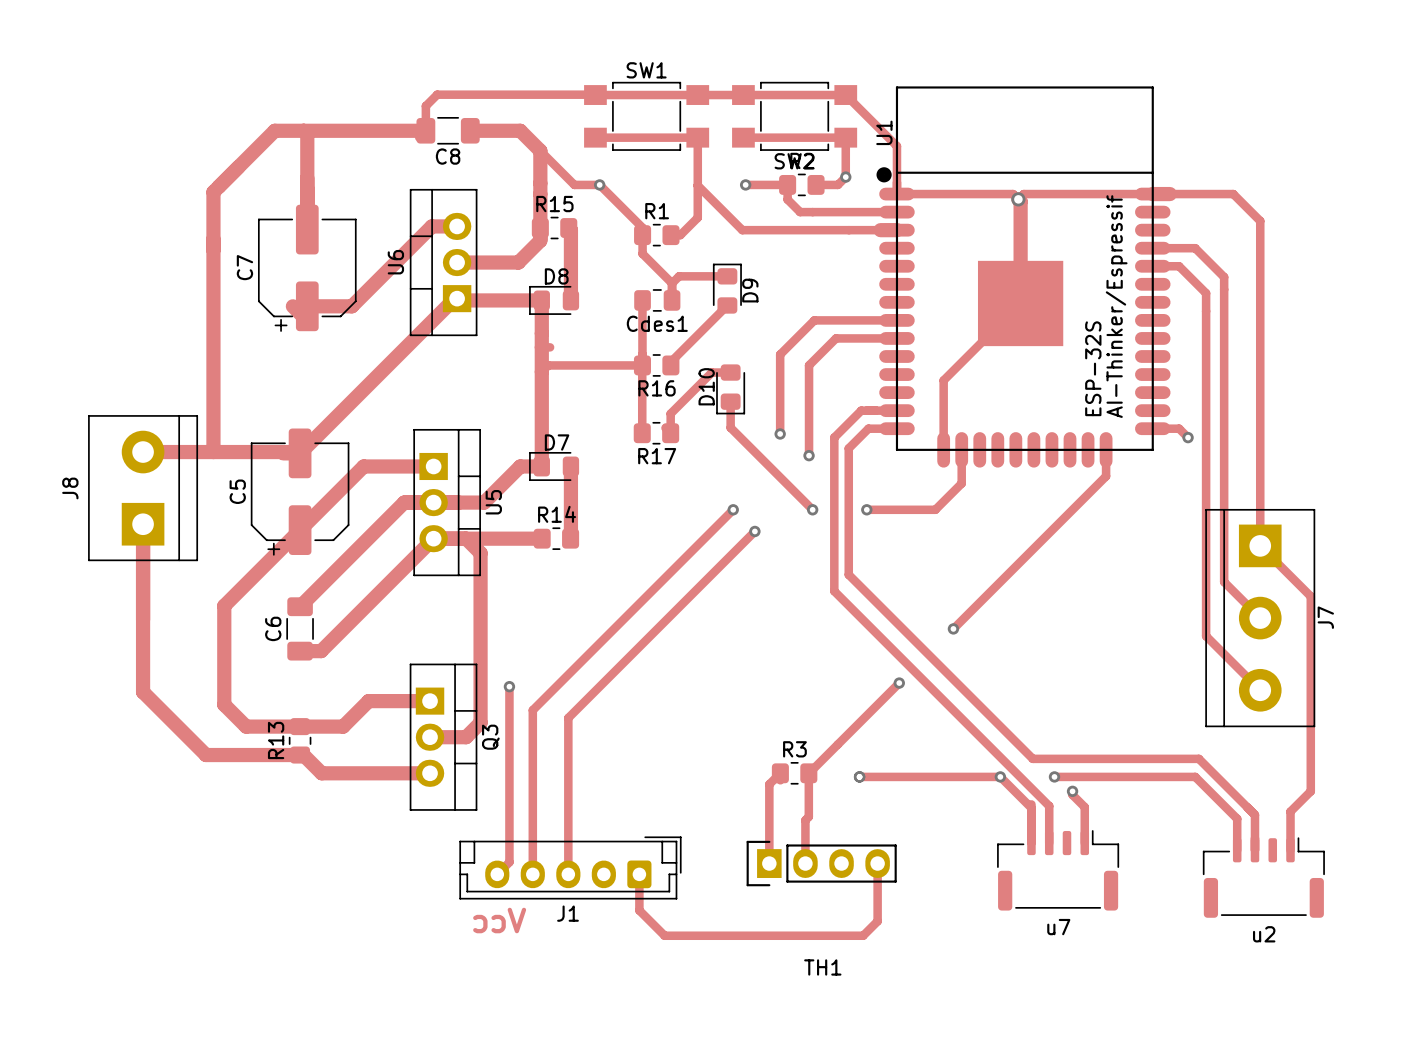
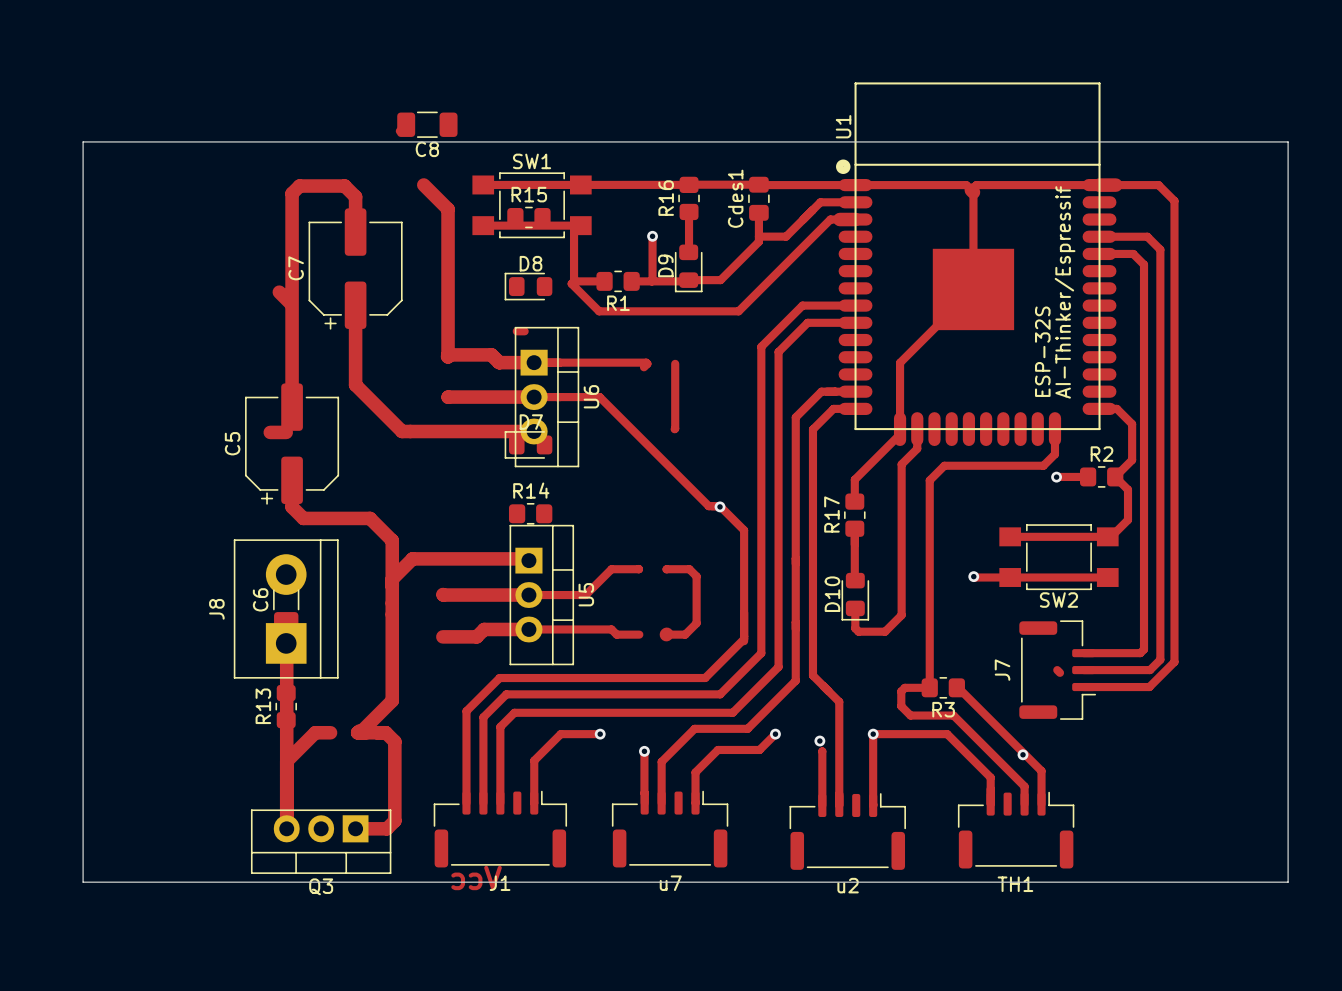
track: (585, 94) (437, 94) (425, 106) (425, 130) (274, 130) (213, 192) (213, 452) -> none
track: (595, 95) (845, 95) (896, 146) (896, 194) -> (689, 184) (855, 185)
SW1 position: (646, 116) -> (532, 205)
SW2 position: (794, 116) -> (1058, 557)
track: (303, 130) (307, 134) (307, 229) -> none
track: (475, 135) (470, 130) (520, 130) (540, 150) -> none
track: (595, 137) (697, 137) (697, 217) (680, 235) (671, 235) -> none
track: (743, 137) (845, 137) (845, 177) (837, 184) (816, 184) -> none
board edge: none -> (83, 141) (1288, 141) (1288, 882) (83, 882) (83, 141)
track: (540, 150) (540, 240) (518, 262) (457, 262) -> none
track: (540, 150) (574, 184) (599, 184) (642, 227) (642, 253) (672, 283) (671, 299) -> none
via: (845, 177) -> none
via: (599, 184) -> none
track: (745, 184) (787, 184) (787, 199) (800, 212) (860, 212) -> (758, 236) (786, 236) (820, 202)
via: (745, 184) -> none
R2 position: (801, 184) -> (1101, 476)
track: (697, 185) (742, 230) (870, 230) -> (574, 281) (571, 283) (599, 311) (738, 311) (830, 219)
track: none -> (423, 184) (448, 209) (447, 356)
track: none -> (483, 184) (689, 184)
track: (1214, 194) (1233, 194) (1260, 221) (1260, 545) (1310, 596) (1310, 791) (1290, 811) (1290, 850) -> (1158, 185) (1174, 201) (1174, 662) (1149, 687) (1083, 687)
via: (1018, 199) -> none
track width: thick (1020, 201) (1020, 303) -> thin (973, 192) (973, 289)
R1 name position: R1 (657, 211) -> R1 (618, 303)
track: none -> (689, 211) (688, 252)
track: none -> (758, 212) (758, 241) (720, 280) (631, 281)
track: (457, 226) (431, 226) (351, 306) (307, 306) -> none
track: (568, 228) (570, 230) (571, 300) -> none
R1 position: (656, 235) -> (618, 281)
track: none -> (483, 225) (580, 225) (574, 232) (574, 281)
track: none -> (355, 232) (355, 196) (344, 186) (299, 186) (292, 193) (292, 407)
track: none -> (652, 236) (651, 281)
via: none -> (652, 236)
track: (1195, 248) (1224, 277) (1224, 581) (1260, 618) -> (1140, 236) (1147, 236) (1160, 249) (1160, 659) (1150, 670) (1083, 670)
U6 rotation: 0° (443, 262) -> 180° (546, 397)
U6 position: (443, 262) -> (546, 397)
track: (1179, 266) (1206, 293) (1206, 636) (1260, 690) -> (1124, 253) (1133, 253) (1144, 264) (1144, 649) (1140, 653) (1083, 653)
C7 position: (307, 268) -> (355, 268)
track: (727, 276) (679, 276) (672, 283) -> none
D9 rotation: 0° (727, 288) -> 180° (688, 268)
track: none -> (574, 281) (604, 281)
track: (457, 298) (458, 300) (541, 300) -> none
track: (457, 298) (454, 298) (300, 453) (143, 452) -> none
track: (541, 300) (541, 466) (520, 466) (484, 502) (404, 502) (300, 606) -> none
track: (642, 300) (642, 365) -> none
Cdes1 rotation: 0° (657, 300) -> 90° clockwise (758, 198)
Cdes1 position: (657, 300) -> (758, 198)
track: (727, 308) (727, 305) (670, 361) (670, 365) -> none
track: none -> (355, 305) (355, 385) (402, 431) (534, 431) (535, 429)
track: (841, 320) (814, 320) (780, 354) (780, 433) -> (802, 305) (761, 346) (761, 653) (720, 694) (506, 694) (483, 717) (483, 803)
track: (846, 338) (836, 338) (809, 365) (809, 455) -> (807, 322) (778, 351) (778, 667) (732, 712) (514, 712) (500, 726) (500, 803)
track: (642, 365) (642, 433) -> none
track: (642, 365) (548, 365) (541, 371) -> none
R16 rotation: 0° (656, 365) -> 90° clockwise (689, 198)
R16 position: (656, 365) -> (689, 198)
track: none -> (448, 354) (491, 354) (499, 362) (536, 362)
track: (730, 372) (711, 372) (670, 413) (670, 433) (665, 428) -> none
track: none -> (534, 362) (646, 362) (647, 363) (643, 367)
track: none -> (675, 363) (674, 429)
D10 position: (730, 389) -> (855, 596)
track: (730, 401) (730, 427) (812, 509) -> none
track: none -> (448, 397) (534, 397)
track: none -> (534, 397) (599, 397) (708, 506) (720, 506) (744, 530) (744, 641)
track: (873, 428) (868, 428) (848, 448) (848, 574) (1032, 758) (1198, 758) (1254, 814) (1254, 850) -> (833, 408) (812, 429) (812, 675) (839, 701) (839, 805)
track: (1171, 428) (1179, 428) (1188, 437) -> (1116, 408) (1132, 424) (1132, 460) (1115, 476) (1128, 489) (1128, 519) (1111, 536) (1010, 536)
R17 rotation: 0° (656, 433) -> 90° clockwise (854, 515)
R17 position: (656, 433) -> (854, 515)
via: (780, 433) -> none
via: (1188, 437) -> none
track: none -> (900, 429) (900, 434) (854, 479) (854, 501)
via: (809, 455) -> none
track: (433, 466) (363, 466) (224, 605) (224, 704) (246, 726) (343, 726) (368, 701) (430, 701) -> none
track: (570, 466) (570, 538) -> none
track: (961, 470) (961, 483) (935, 509) (866, 509) -> (917, 448) (901, 464) (901, 615) (885, 631) (858, 631) (855, 628) (855, 608)
J8 position: (143, 488) -> (286, 608)
track: (1094, 488) (953, 628) -> (1043, 465) (944, 465) (929, 480) (929, 687) (904, 687) (901, 691) (901, 706) (910, 715) (953, 715) (1024, 786) (1024, 804)
C5 position: (300, 492) -> (292, 444)
track: none -> (1056, 476) (1088, 476)
via: none -> (1056, 477)
U5 position: (447, 502) -> (541, 595)
track: none -> (292, 480) (292, 507) (303, 518) (370, 518) (392, 540) (392, 700) (360, 732)
J7 footprint: [1205, 508, 1316, 728] -> [1019, 620, 1097, 720]
track: (733, 509) (532, 710) (532, 874) -> none
via: (733, 509) -> none
via: (812, 509) -> none
via: (866, 509) -> none
track: (143, 524) (143, 692) (206, 755) (303, 755) (321, 773) (430, 773) -> none
track: (754, 531) (568, 718) (568, 874) -> none
track: (466, 538) (480, 553) (480, 722) (466, 737) (430, 737) -> none
track: (542, 538) (433, 538) (321, 651) (300, 651) -> none
track: none -> (854, 528) (855, 580)
track: none -> (528, 560) (527, 558) (412, 558) (392, 579)
track: (834, 591) (1049, 806) (1049, 843) -> (795, 563) (795, 680) (747, 728) (694, 728) (661, 761) (661, 803)
track: none -> (638, 568) (611, 569) (585, 595) (442, 594)
track: none -> (666, 569) (689, 569) (696, 576) (696, 623) (685, 634) (666, 634)
track: none -> (973, 576) (1107, 577)
J7 name position: J7 (1325, 617) -> J7 (1002, 670)
via position: (953, 628) -> (973, 576)
track: none -> (639, 634) (616, 634) (611, 629) (484, 629) (476, 636) (442, 636)
track: none -> (744, 639) (705, 678) (499, 678) (466, 711) (466, 803)
track: none -> (282, 643) (286, 643) (286, 828)
track: (899, 683) (809, 773) -> none
via: (899, 683) -> none
track: (509, 686) (509, 862) (497, 874) -> none
via: (509, 686) -> none
track: none -> (1057, 670) (1060, 672)
track: none -> (956, 687) (1041, 771) (1041, 804)
Q3 rotation: 0° (443, 737) -> 90° clockwise (321, 841)
Q3 position: (443, 737) -> (321, 841)
R3 name position: R3 (794, 749) -> R3 (943, 709)
track: none -> (359, 731) (357, 732) (385, 732) (394, 741) (394, 820) (386, 828) (355, 828) (355, 830)
track: none -> (330, 732) (315, 732) (286, 761)
track: none -> (600, 734) (560, 734) (534, 760) (534, 803)
via: none -> (600, 734)
track: none -> (775, 734) (759, 749) (717, 749) (695, 772) (695, 802)
via: none -> (775, 734)
via: none -> (873, 734)
R3 position: (794, 773) -> (943, 687)
track: (808, 773) (808, 816) (805, 820) (805, 863) -> none
track: (859, 776) (1000, 776) -> (873, 805) (873, 734) (947, 734) (954, 741)
via: (1000, 776) -> none
track: (1054, 776) (1195, 776) (1237, 818) (1237, 850) -> none
via: (1054, 776) -> none
track: (780, 780) (780, 773) (769, 784) (769, 863) -> none
track: none -> (644, 751) (644, 803)
via: none -> (644, 751)
track: none -> (822, 751) (822, 805)
track: (1072, 791) (1072, 794) (1084, 807) (1084, 843) -> none
track: (1031, 804) (1031, 843) -> none
track: none -> (983, 770) (990, 777) (990, 804)
J1 footprint: [459, 836, 682, 900] -> [433, 790, 568, 868]
TH1 footprint: [746, 840, 897, 887] -> [957, 791, 1075, 869]
track: (877, 863) (877, 921) (863, 935) (664, 935) (639, 910) (639, 874) -> none
u7 position: (1058, 870) -> (670, 829)
u2 position: (1263, 877) -> (847, 831)
TH1 name position: TH1 (822, 967) -> TH1 (1015, 884)

